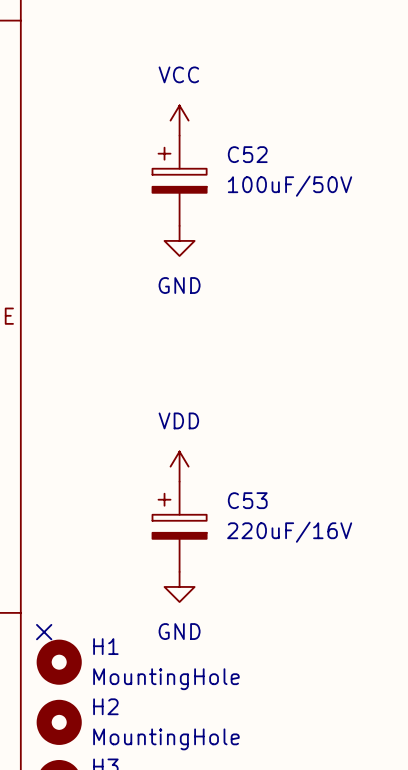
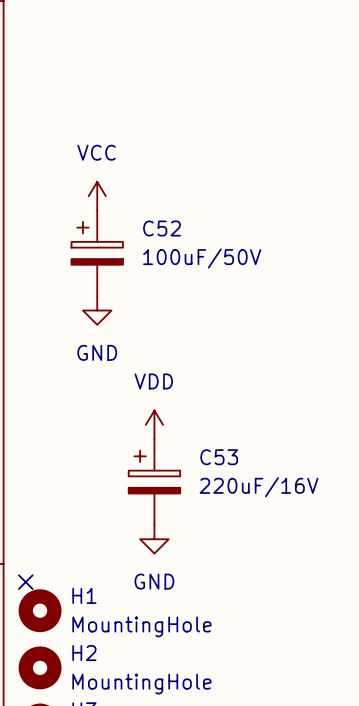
power symbol position: VCC (179, 120) -> VCC (97, 196)
C52 position: (179, 180) -> (97, 253)
power symbol position: GND (179, 240) -> GND (97, 310)

